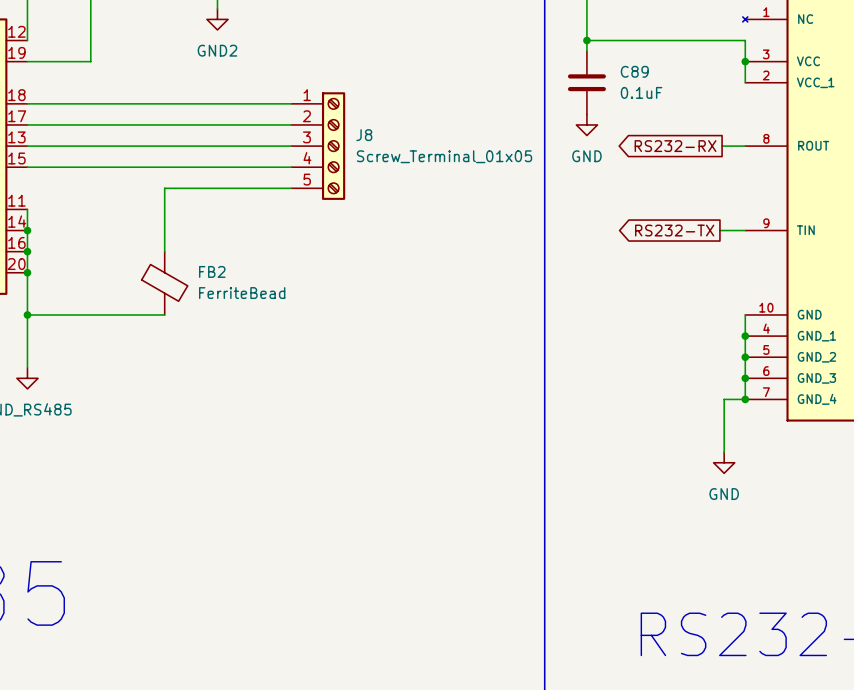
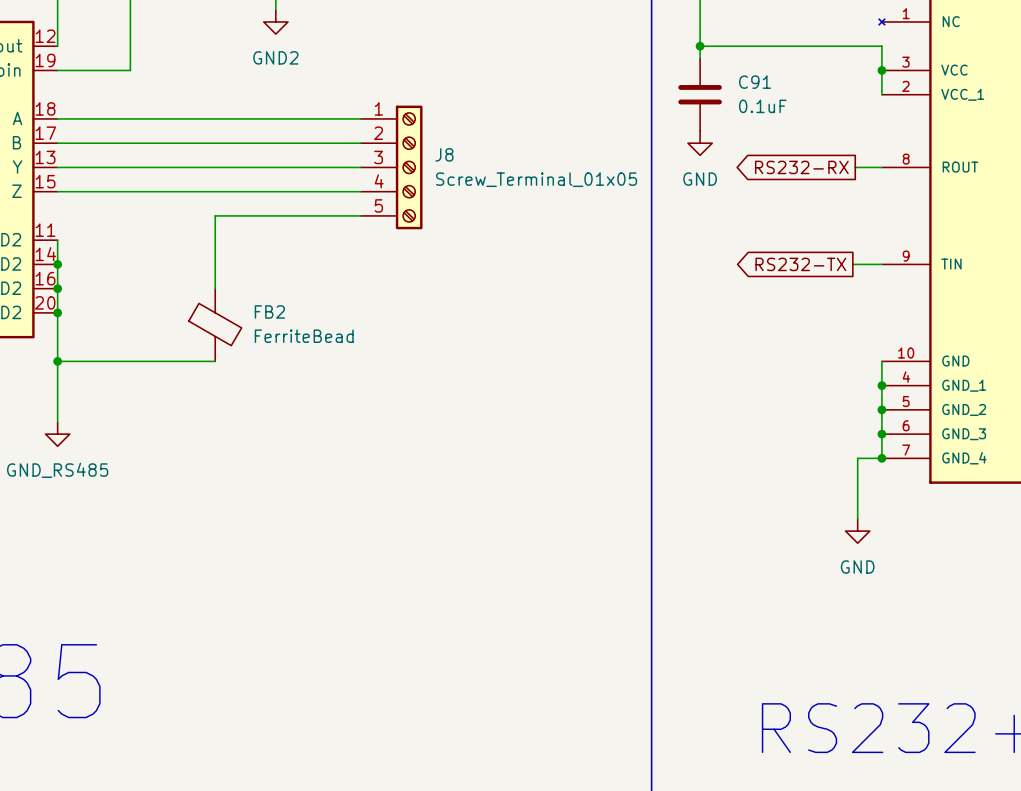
C89 name: C89 (634, 71) -> C91 (755, 82)

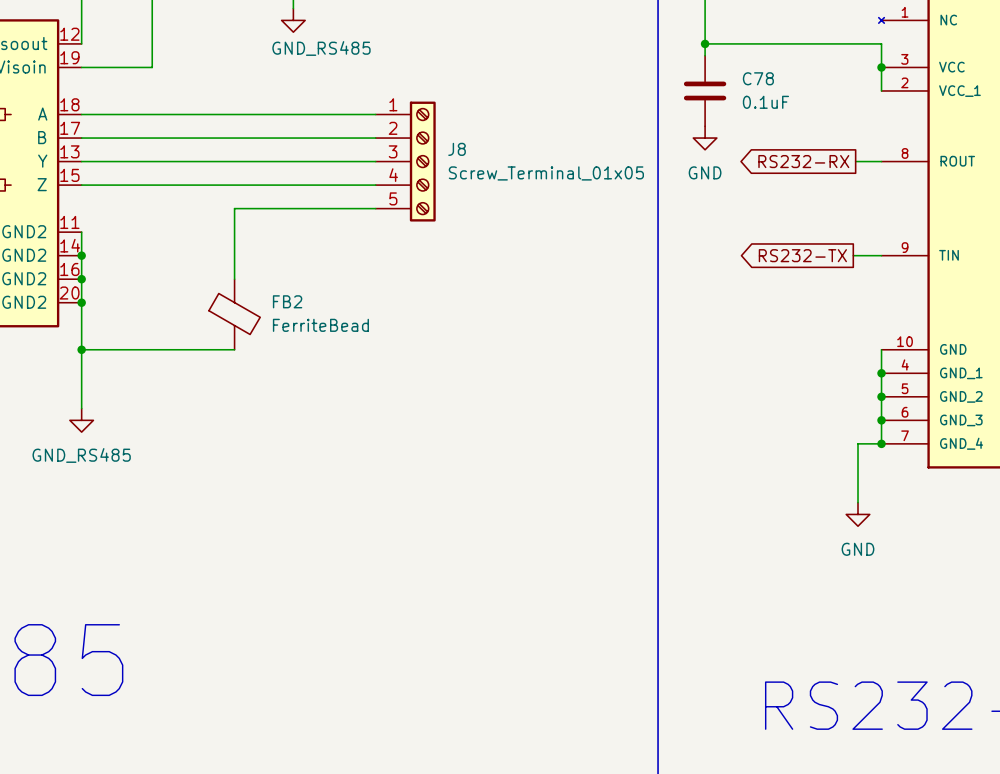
power symbol: GND2 (275, 21) -> GND_RS485 (293, 20)
C91 name: C91 (755, 82) -> C78 (758, 78)

